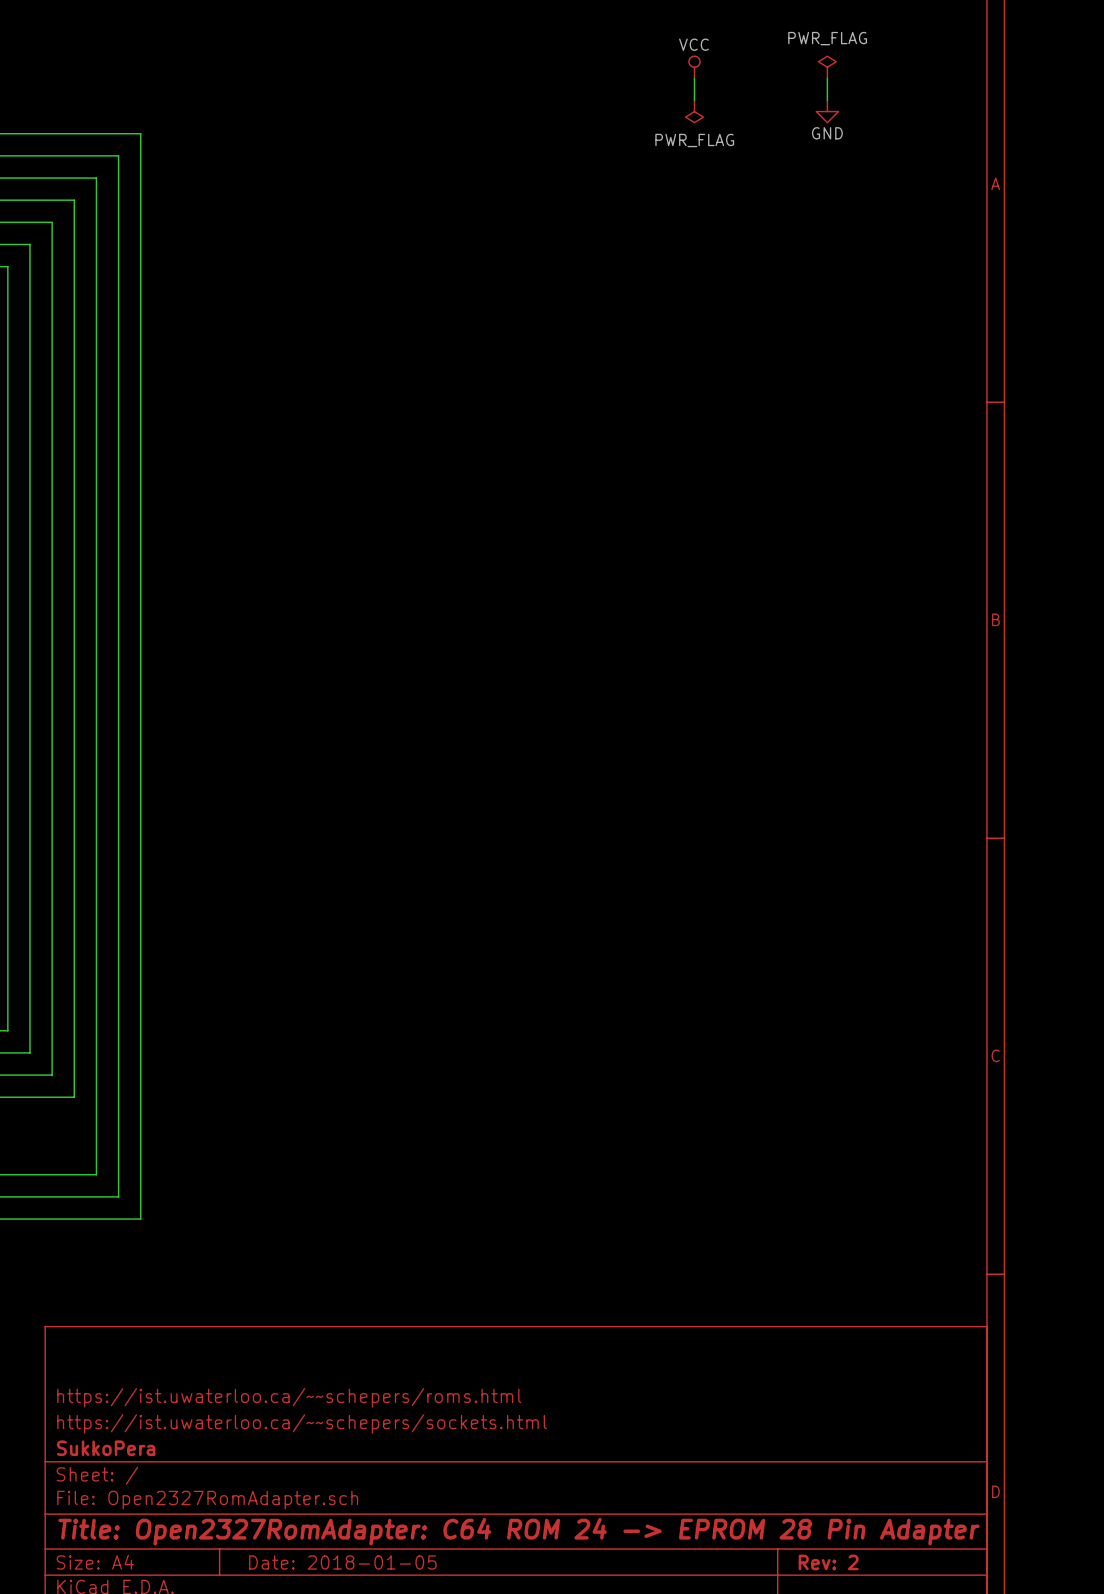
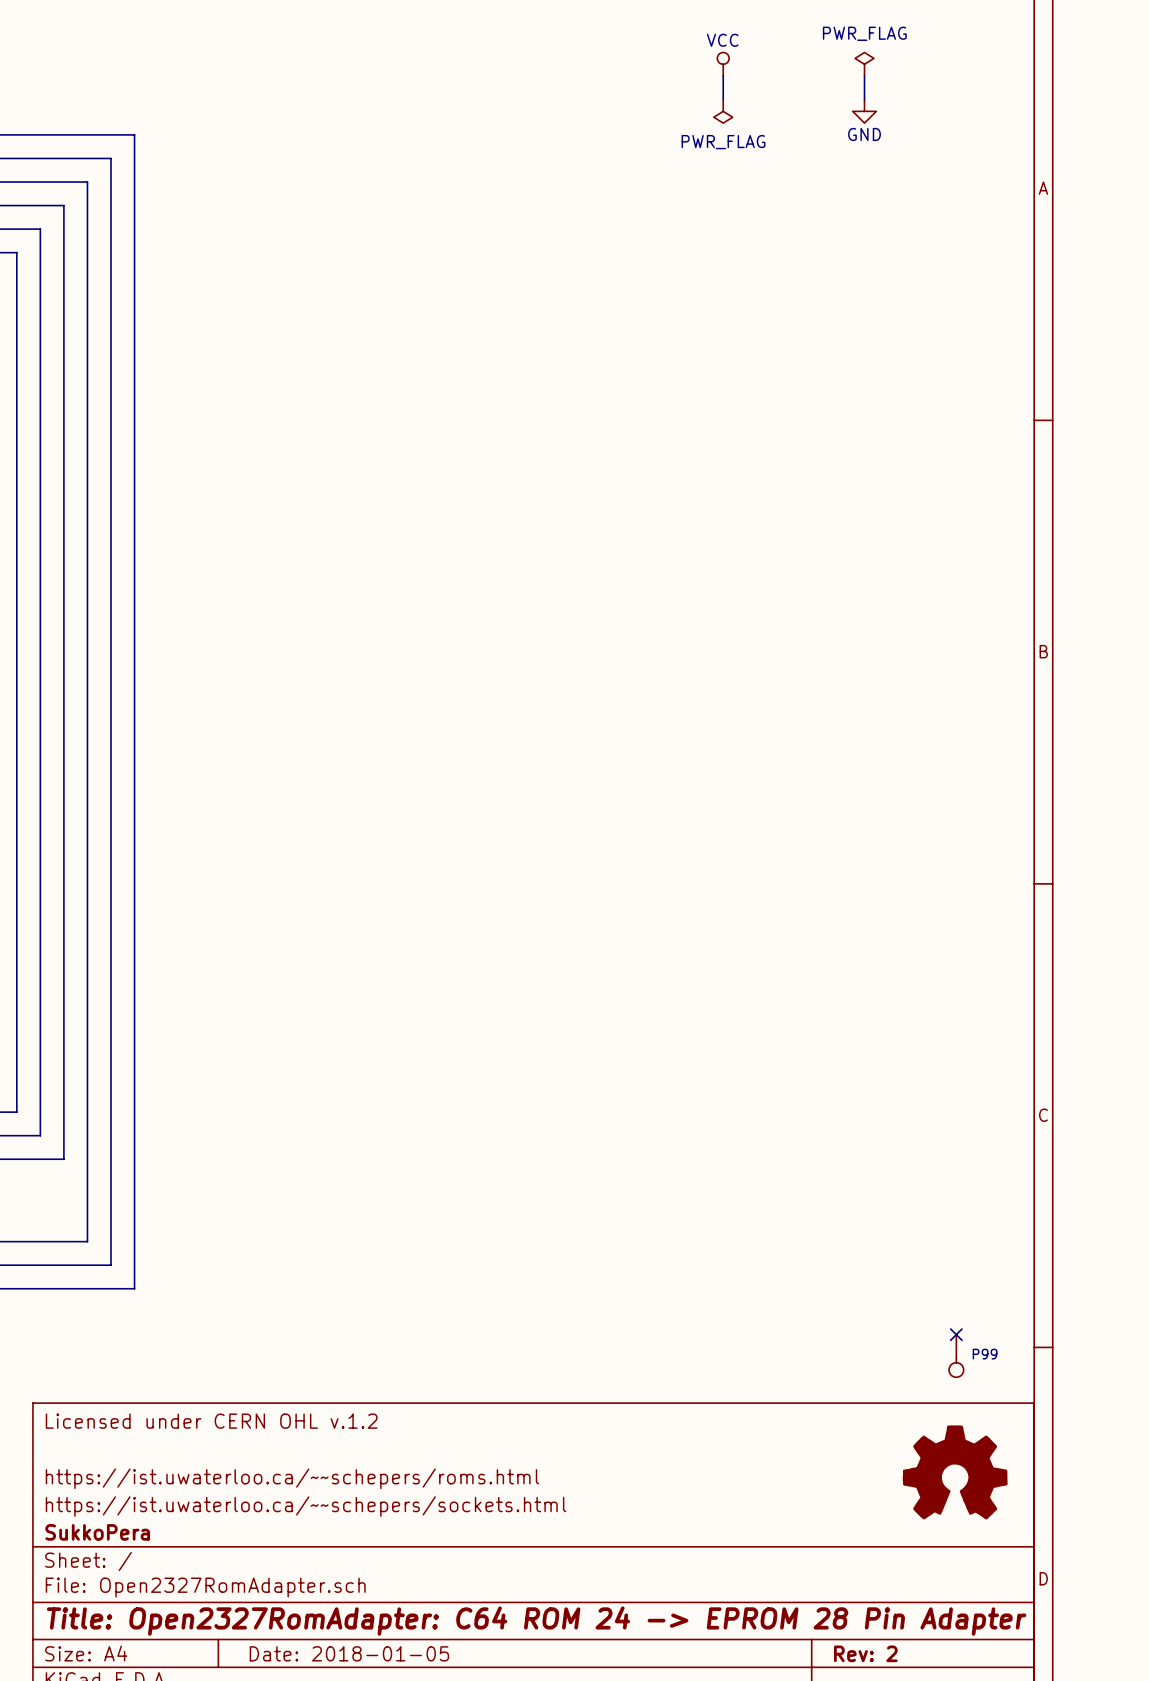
no-connect mark: none -> (956, 1334)
P99: none -> (956, 1355)
title block: none -> Licensed under CERN OHL v.1.2 (211, 1421)
power symbol: none -> (955, 1472)

